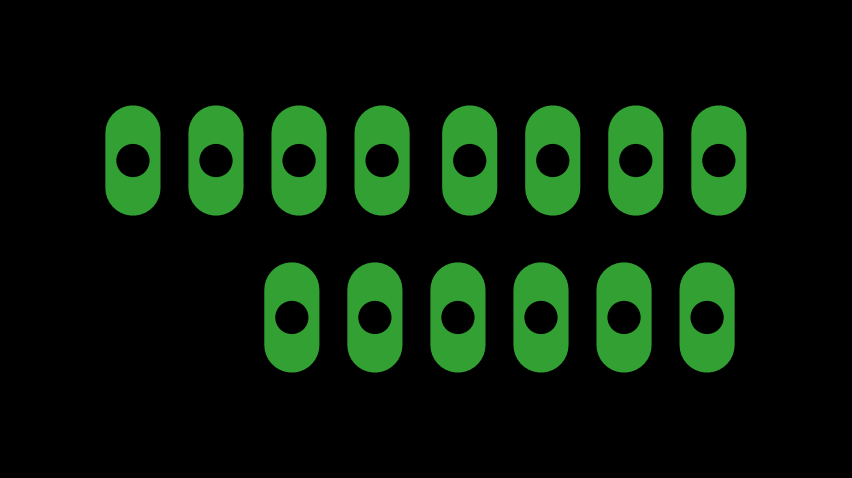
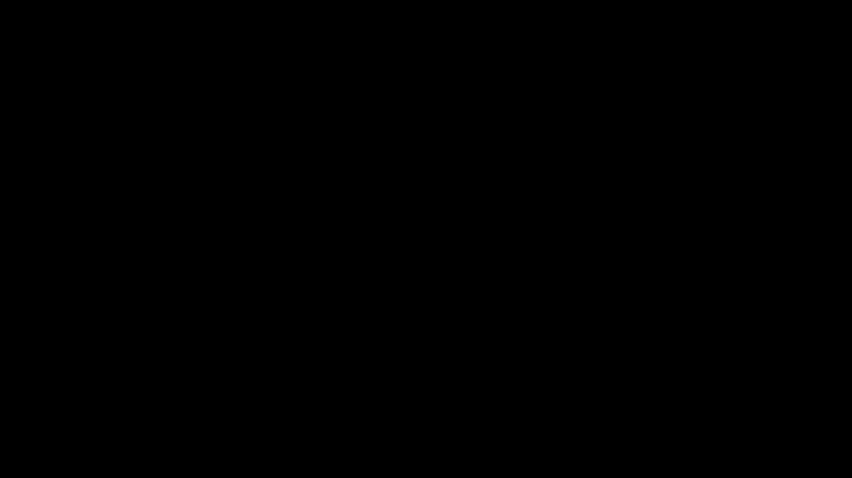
part: (257, 160) -> none
part: (594, 160) -> none
part: (499, 317) -> none

